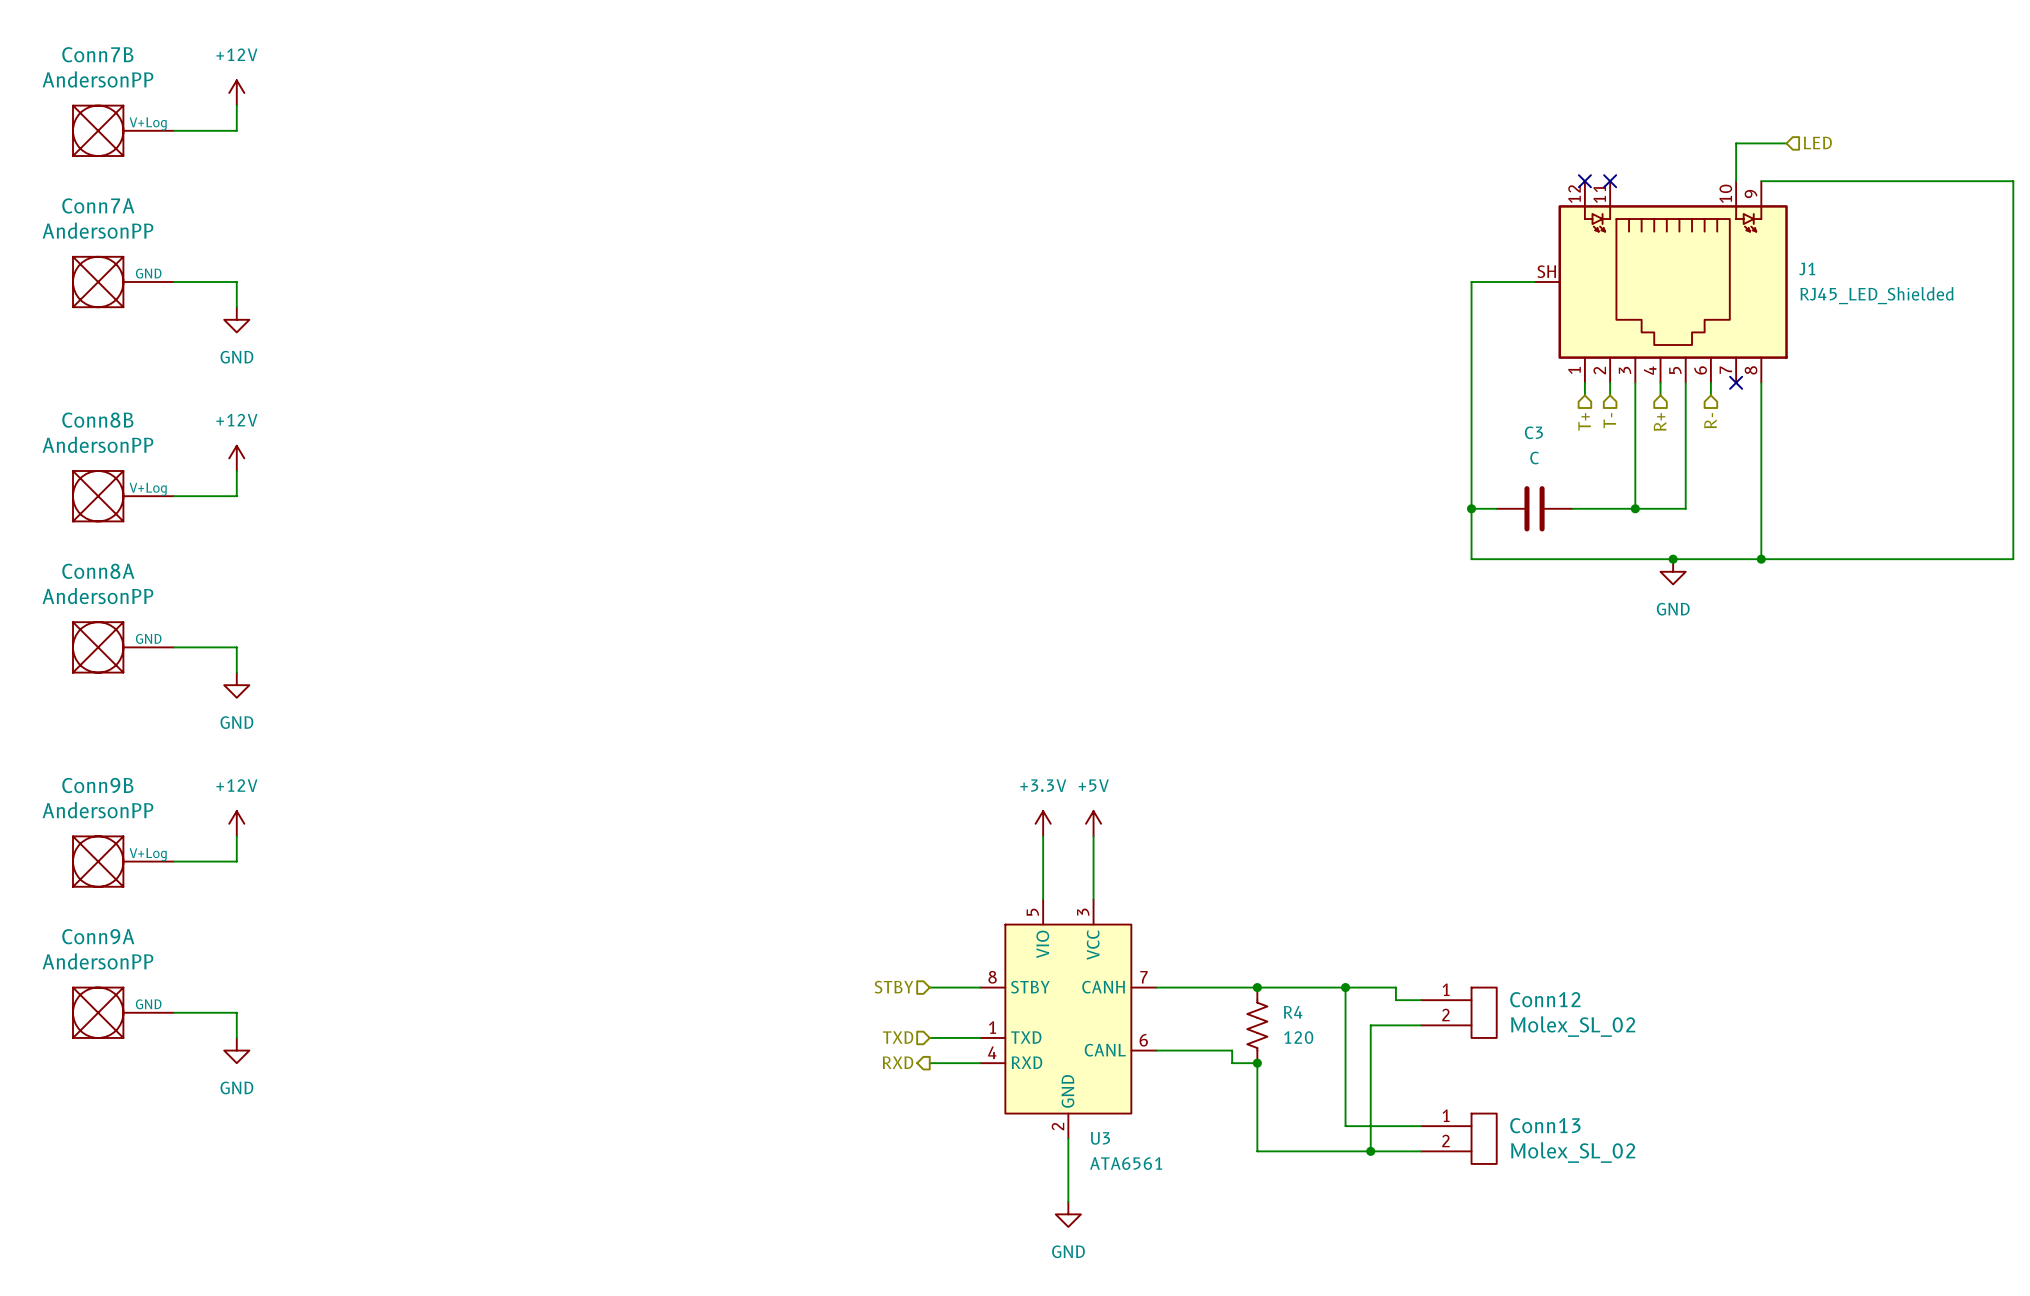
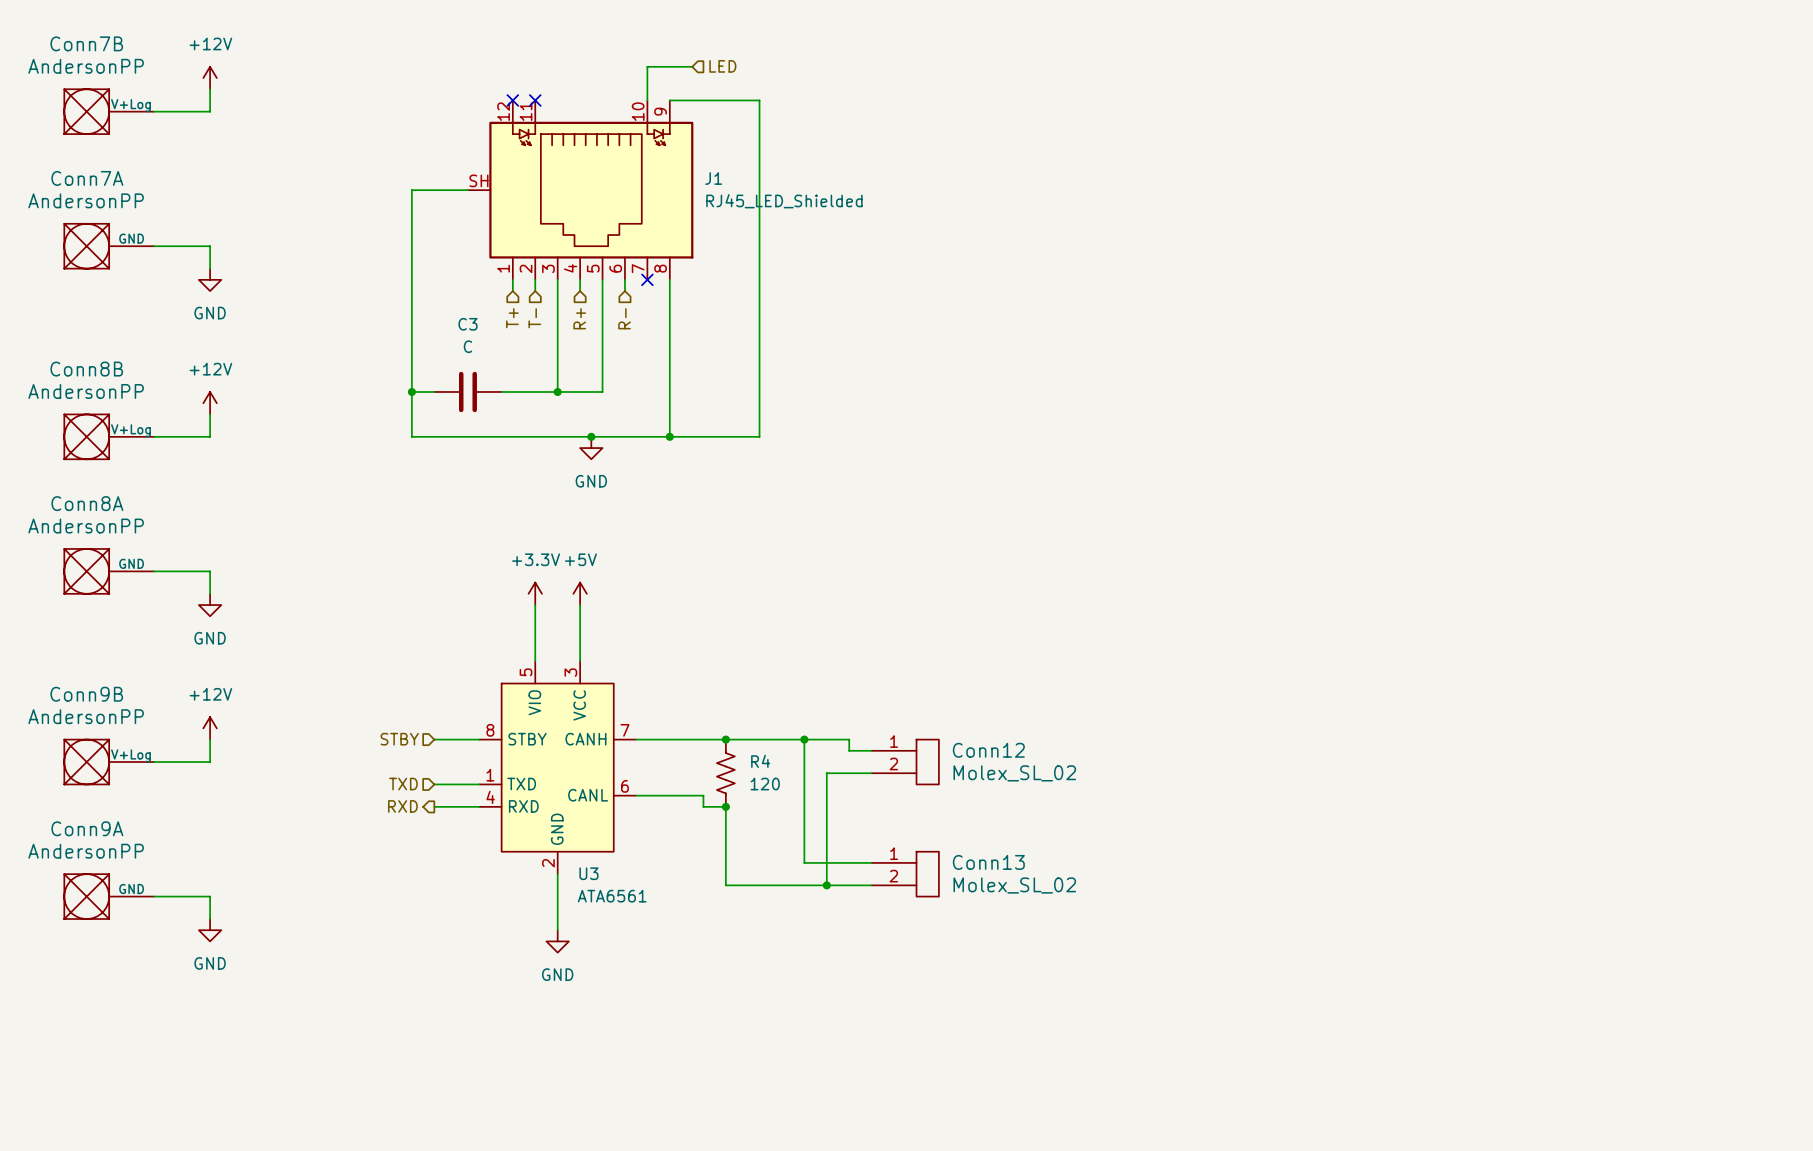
hierarchical label: none -> LED (722, 66)
wire: none -> (692, 66) (647, 66) (647, 100)
no-connect mark: none -> (512, 100)
no-connect mark: none -> (535, 100)
wire: none -> (669, 100) (759, 100) (759, 436) (411, 436) (411, 190) (467, 190)
hierarchical label: LED (1817, 142) -> none
wire: (1786, 143) (1736, 143) (1736, 181) -> none
no-connect mark: (1584, 181) -> none
no-connect mark: (1610, 181) -> none
wire: (1761, 181) (2013, 181) (2013, 559) (1471, 559) (1471, 282) (1534, 282) -> none
J1 position: (1661, 282) -> (580, 190)
wire: none -> (512, 279) (512, 291)
wire: none -> (535, 279) (535, 291)
wire: none -> (557, 279) (557, 391)
wire: none -> (580, 279) (580, 291)
wire: none -> (602, 279) (602, 391) (501, 391)
wire: none -> (624, 279) (624, 291)
no-connect mark: none -> (647, 279)
wire: none -> (669, 279) (669, 436)
hierarchical label: none -> T- (534, 318)
hierarchical label: none -> R- (624, 318)
hierarchical label: none -> T+ (512, 318)
hierarchical label: none -> R+ (579, 318)
wire: (1584, 382) (1584, 395) -> none
wire: (1610, 382) (1610, 395) -> none
wire: (1635, 382) (1635, 508) -> none
wire: (1660, 382) (1660, 395) -> none
wire: (1685, 382) (1685, 508) (1572, 508) -> none
wire: (1710, 382) (1710, 395) -> none
no-connect mark: (1736, 382) -> none
wire: (1761, 382) (1761, 559) -> none
hierarchical label: T- (1609, 420) -> none
hierarchical label: R- (1710, 420) -> none
hierarchical label: T+ (1584, 421) -> none
hierarchical label: R+ (1660, 421) -> none
wire: none -> (411, 391) (434, 391)
junction: none -> (411, 391)
junction: none -> (557, 391)
junction: none -> (591, 436)
junction: none -> (669, 436)
power symbol: none -> GND (591, 448)
wire: (1471, 508) (1496, 508) -> none
junction: (1471, 508) -> none
C3 position: (1534, 508) -> (467, 391)
junction: (1635, 508) -> none
junction: (1673, 559) -> none
junction: (1761, 559) -> none
power symbol: GND (1673, 571) -> none
power symbol: none -> +3.3V (535, 593)
power symbol: none -> +5V (580, 593)
wire: none -> (535, 605) (535, 661)
wire: none -> (580, 605) (580, 661)
power symbol: +3.3V (1043, 823) -> none
power symbol: +5V (1093, 823) -> none
hierarchical label: none -> STBY (399, 739)
wire: none -> (434, 739) (479, 739)
wire: none -> (636, 739) (849, 739) (849, 750) (871, 750)
junction: none -> (725, 739)
wire: none -> (804, 739) (804, 862) (871, 862)
junction: none -> (804, 739)
wire: (1043, 836) (1043, 899) -> none
wire: (1093, 836) (1093, 899) -> none
wire: none -> (871, 773) (826, 773) (826, 885)
hierarchical label: none -> TXD (403, 784)
wire: none -> (434, 784) (479, 784)
wire: none -> (636, 795) (703, 795) (703, 806) (725, 806) (725, 885) (871, 885)
hierarchical label: none -> RXD (402, 806)
wire: none -> (434, 806) (479, 806)
junction: none -> (725, 806)
wire: none -> (557, 874) (557, 930)
hierarchical label: STBY (893, 987) -> none
wire: (929, 987) (980, 987) -> none
wire: (1156, 987) (1395, 987) (1395, 1000) (1421, 1000) -> none
junction: (1257, 987) -> none
wire: (1345, 987) (1345, 1126) (1421, 1126) -> none
junction: (1345, 987) -> none
junction: none -> (826, 885)
Conn12 position: (1458, 1012) -> (905, 762)
U3 position: (1068, 1019) -> (557, 767)
R4 position: (1257, 1025) -> (725, 773)
wire: (1421, 1025) (1370, 1025) (1370, 1151) -> none
hierarchical label: TXD (898, 1037) -> none
wire: (929, 1037) (980, 1037) -> none
wire: (1156, 1050) (1232, 1050) (1232, 1063) (1257, 1063) (1257, 1151) (1421, 1151) -> none
hierarchical label: RXD (897, 1062) -> none
power symbol: none -> GND (557, 941)
wire: (929, 1063) (980, 1063) -> none
junction: (1257, 1063) -> none
wire: (1068, 1138) (1068, 1201) -> none
Conn13 position: (1458, 1138) -> (905, 874)
junction: (1370, 1151) -> none
power symbol: GND (1068, 1214) -> none

